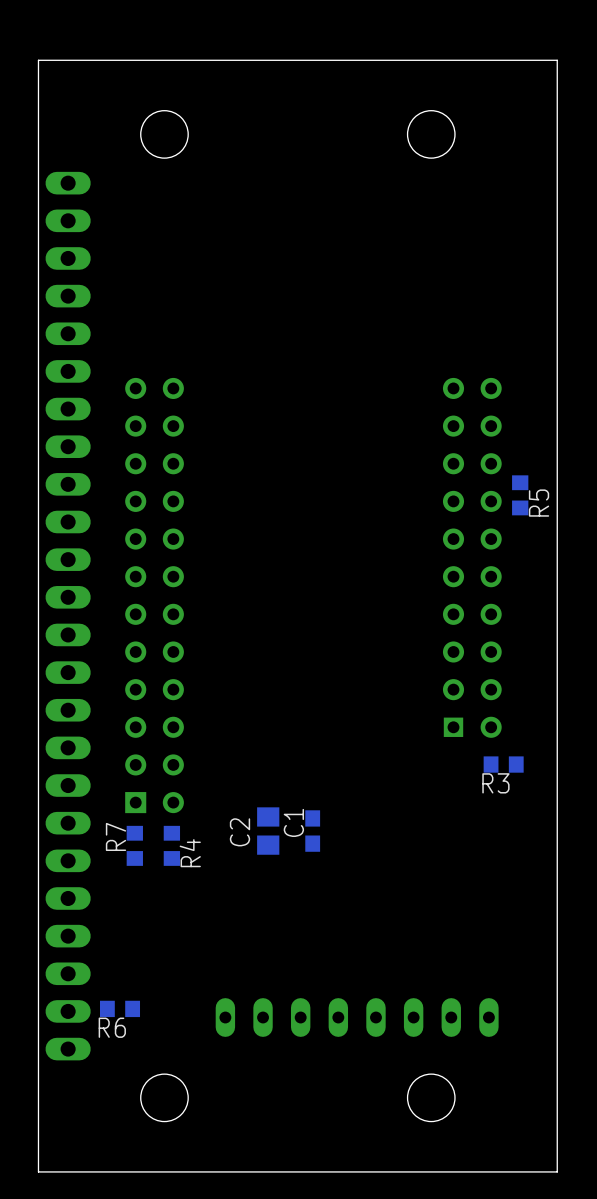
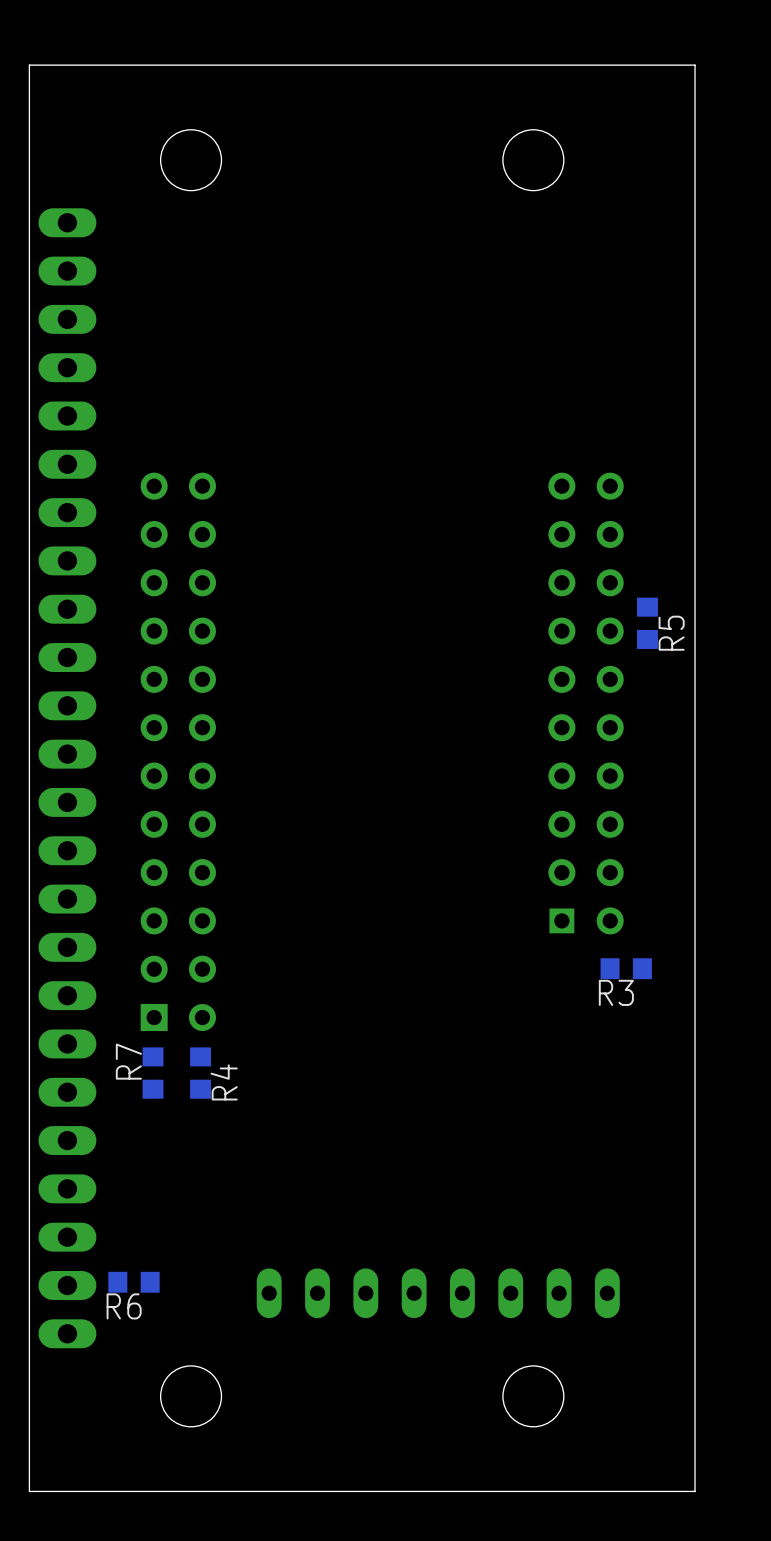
C2: (268, 831) -> none
C1: (312, 831) -> none

